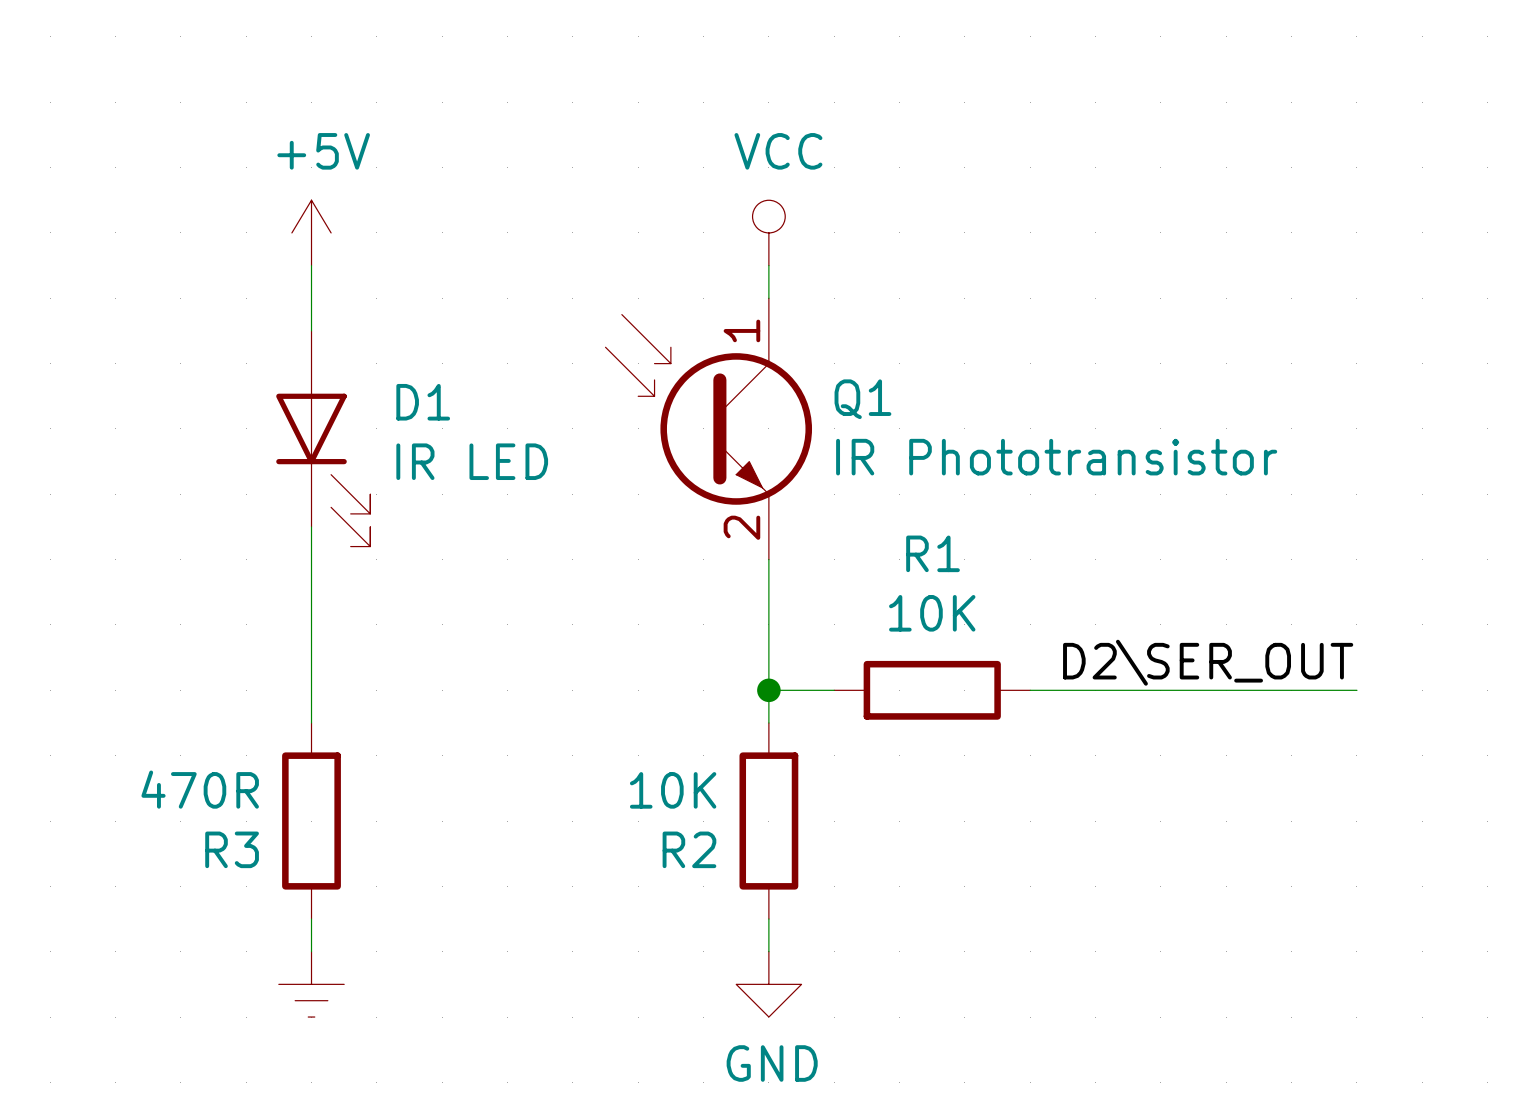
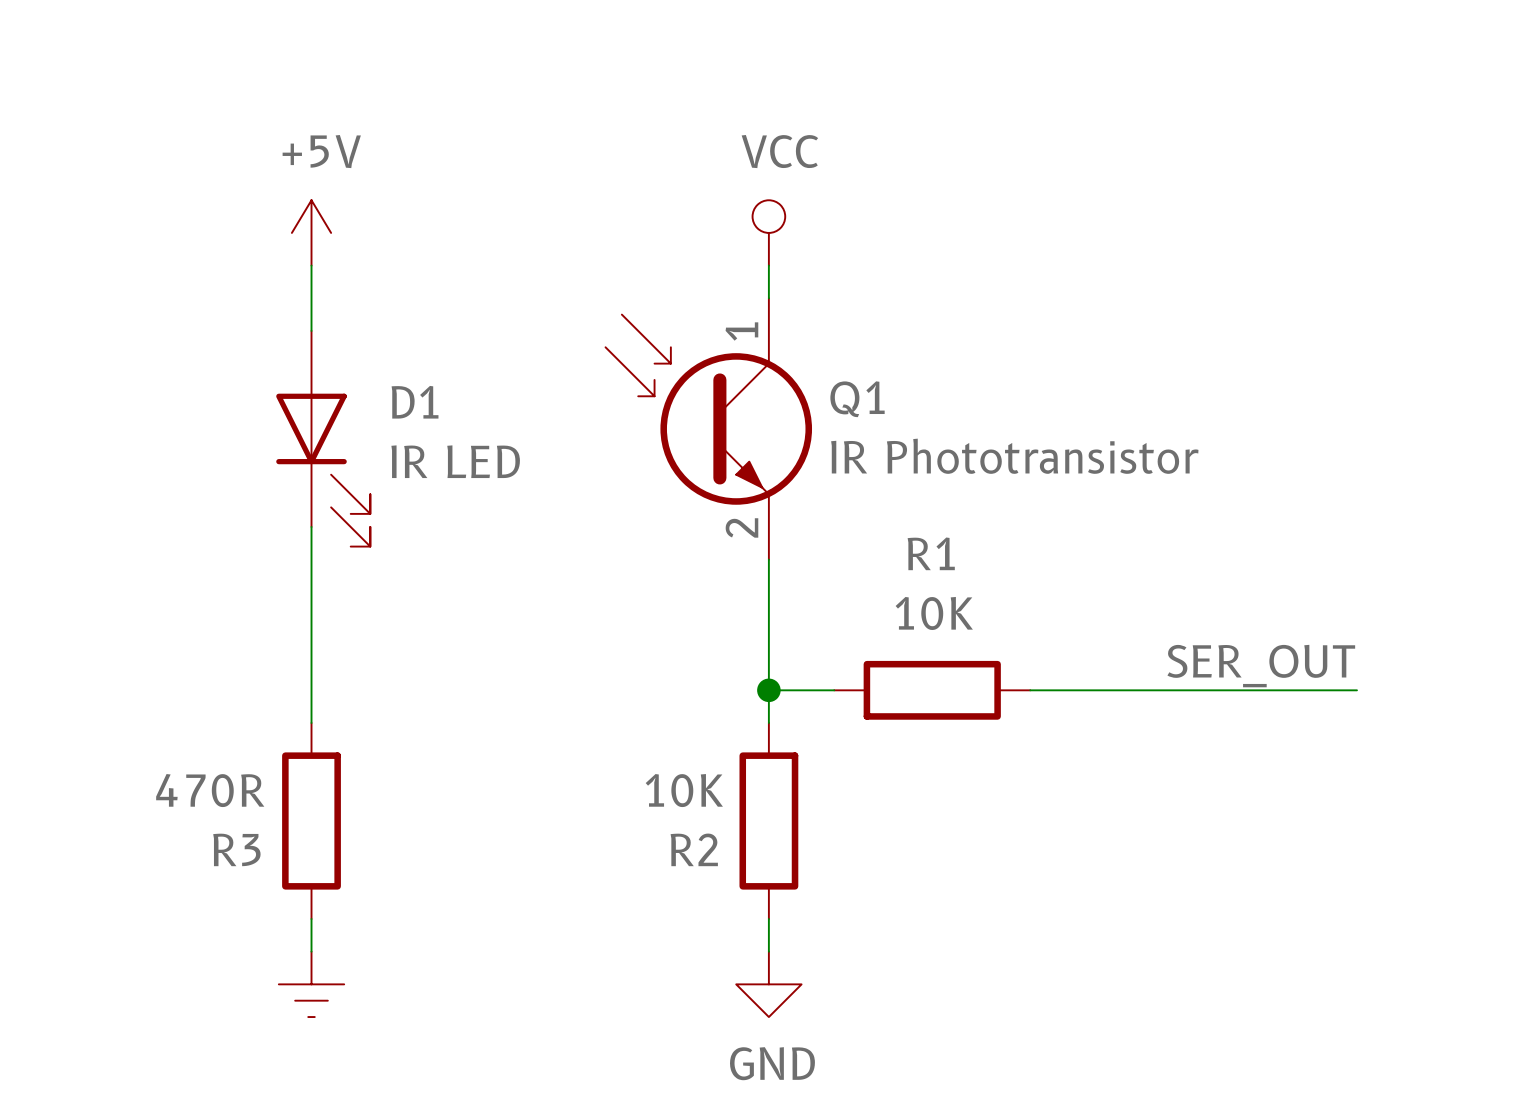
label: D2\SER_OUT (1208, 662) -> SER_OUT (1261, 666)

